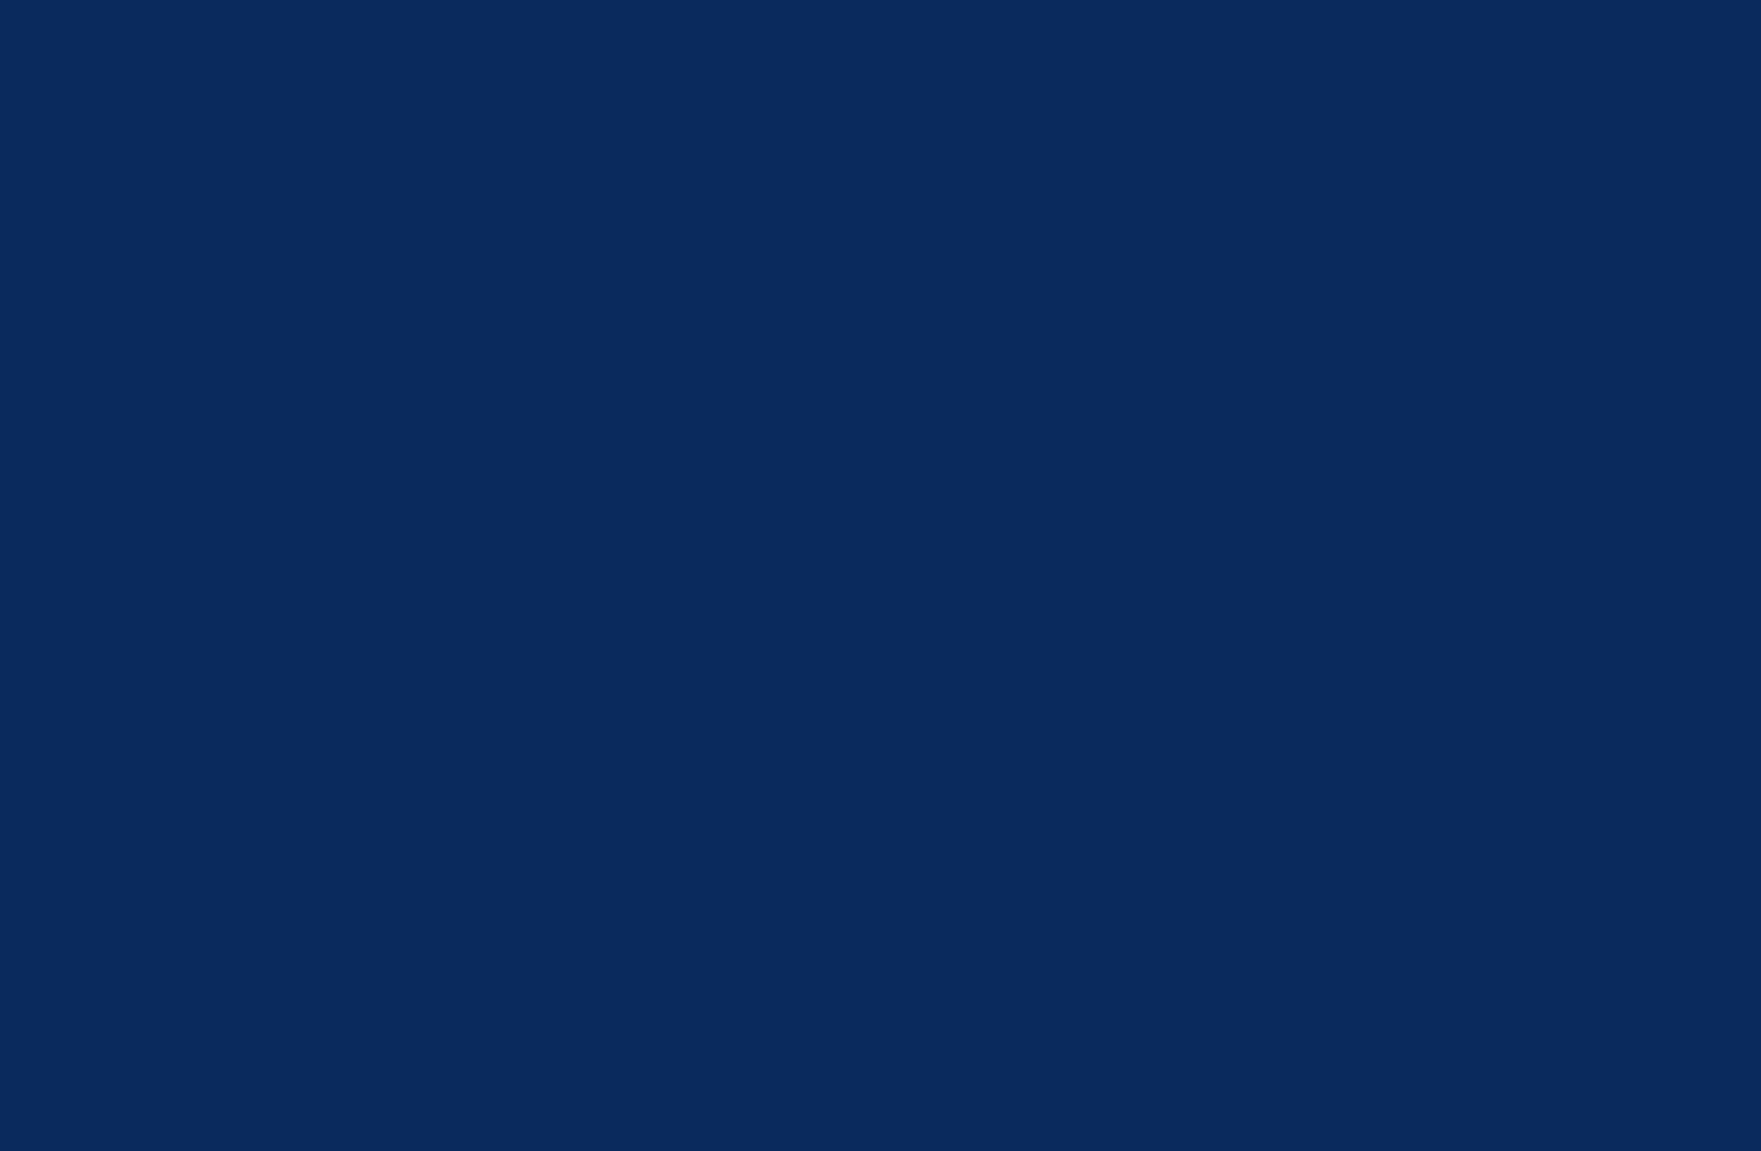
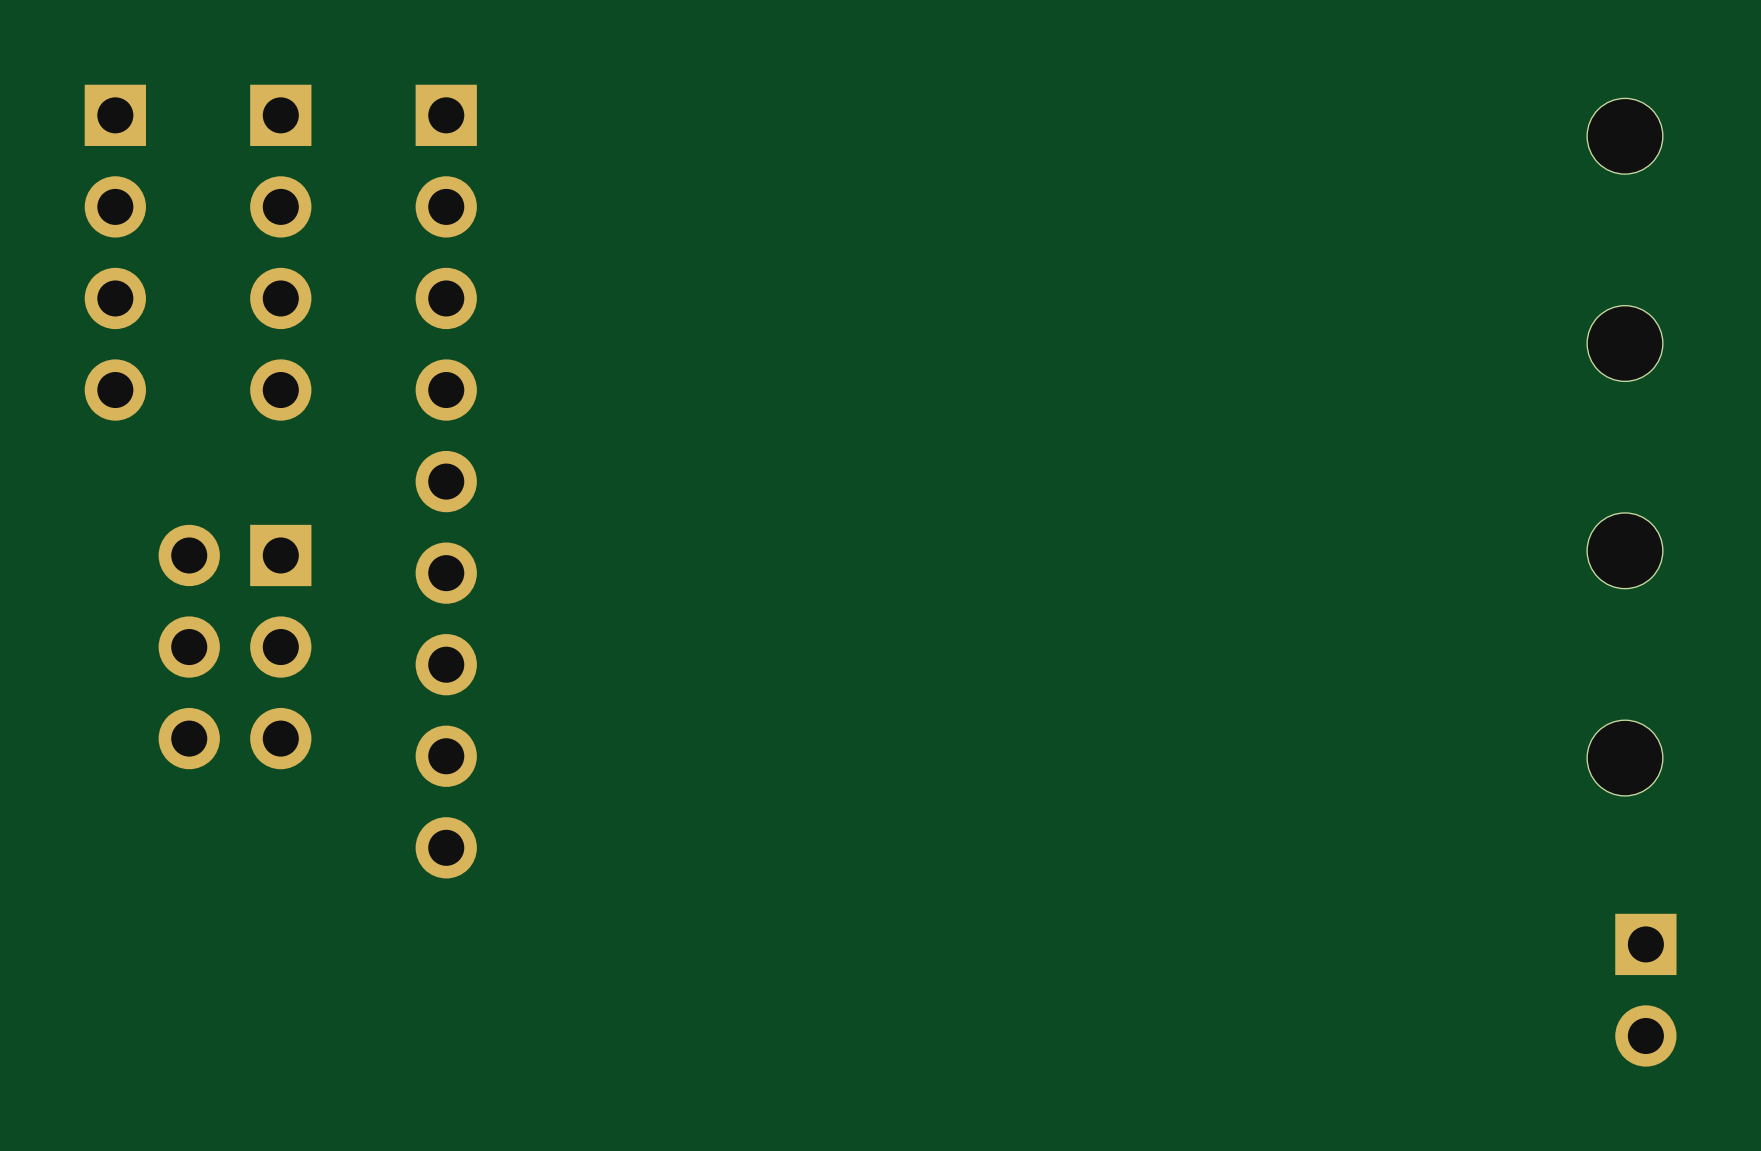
part: none -> (1624, 136)
part: none -> (115, 252)
part: none -> (280, 252)
part: none -> (1624, 343)
part: none -> (446, 481)
part: none -> (1624, 550)
part: none -> (235, 647)
part: none -> (1624, 758)
part: none -> (1645, 990)

